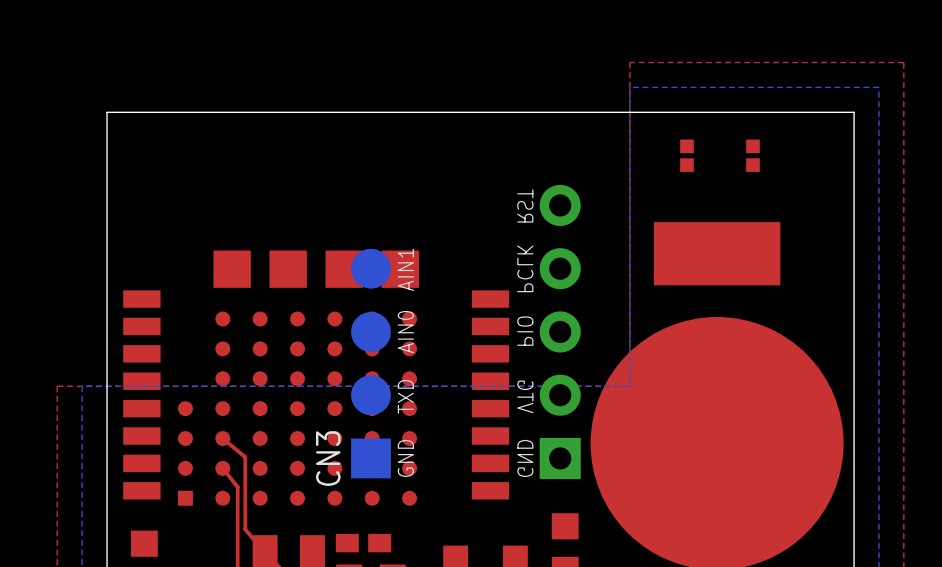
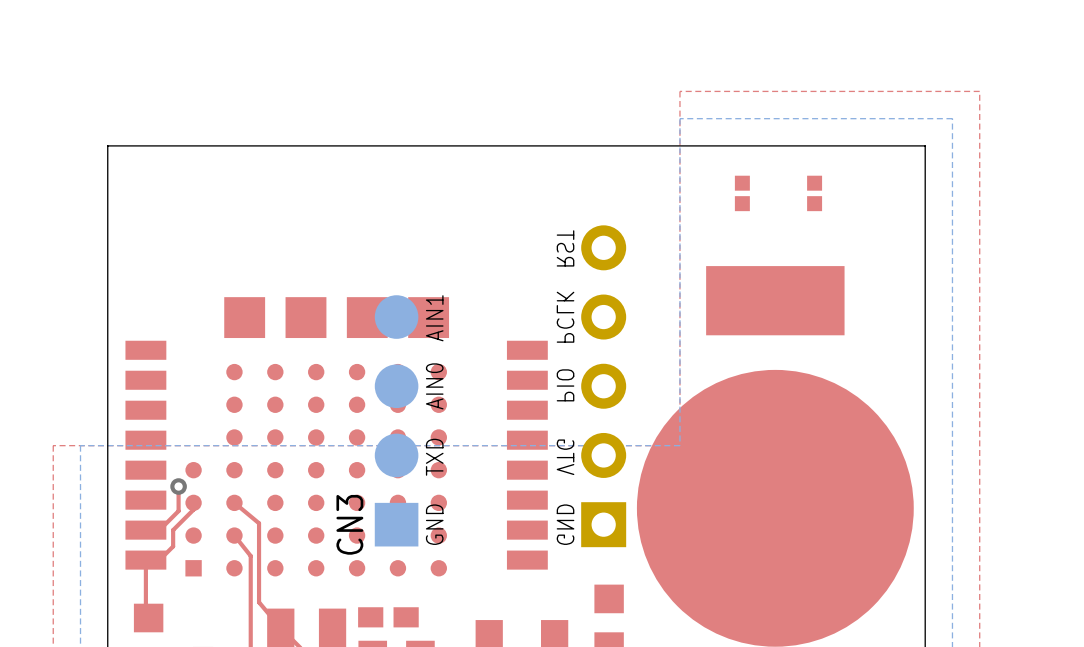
top track: none -> (178, 486) (178, 511) (159, 530) (145, 530)
via: none -> (178, 486)
top track: none -> (193, 502) (193, 509) (173, 530) (173, 546) (159, 560) (145, 560) (145, 615) (148, 618)

